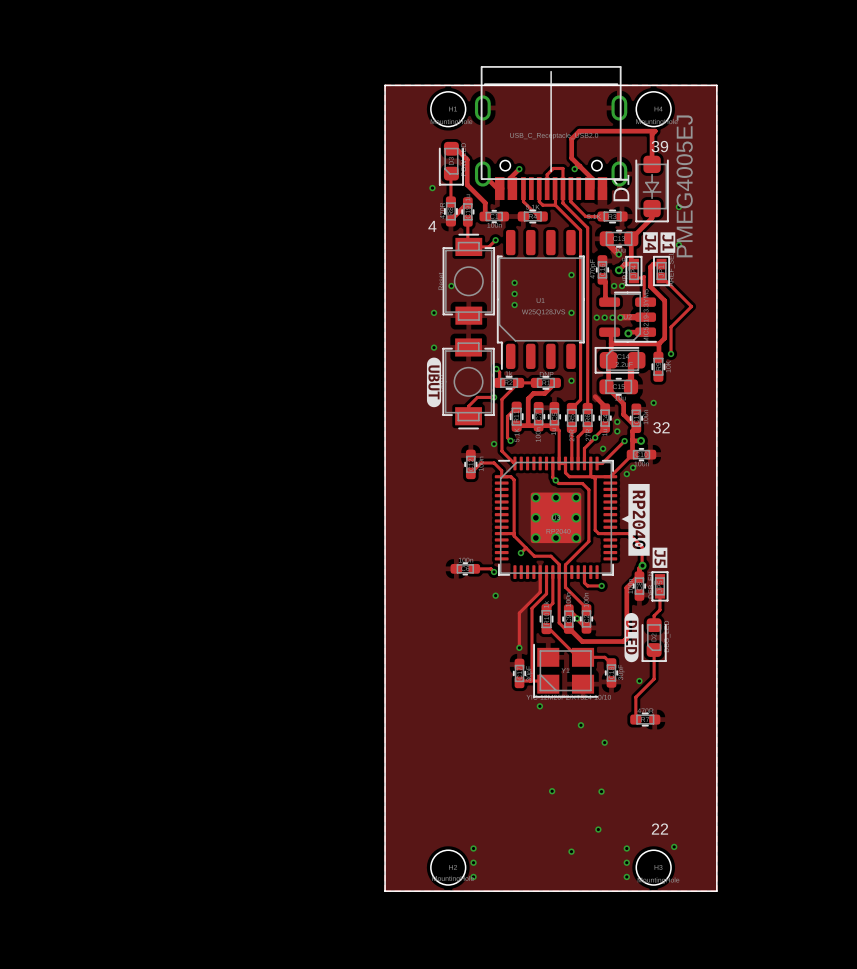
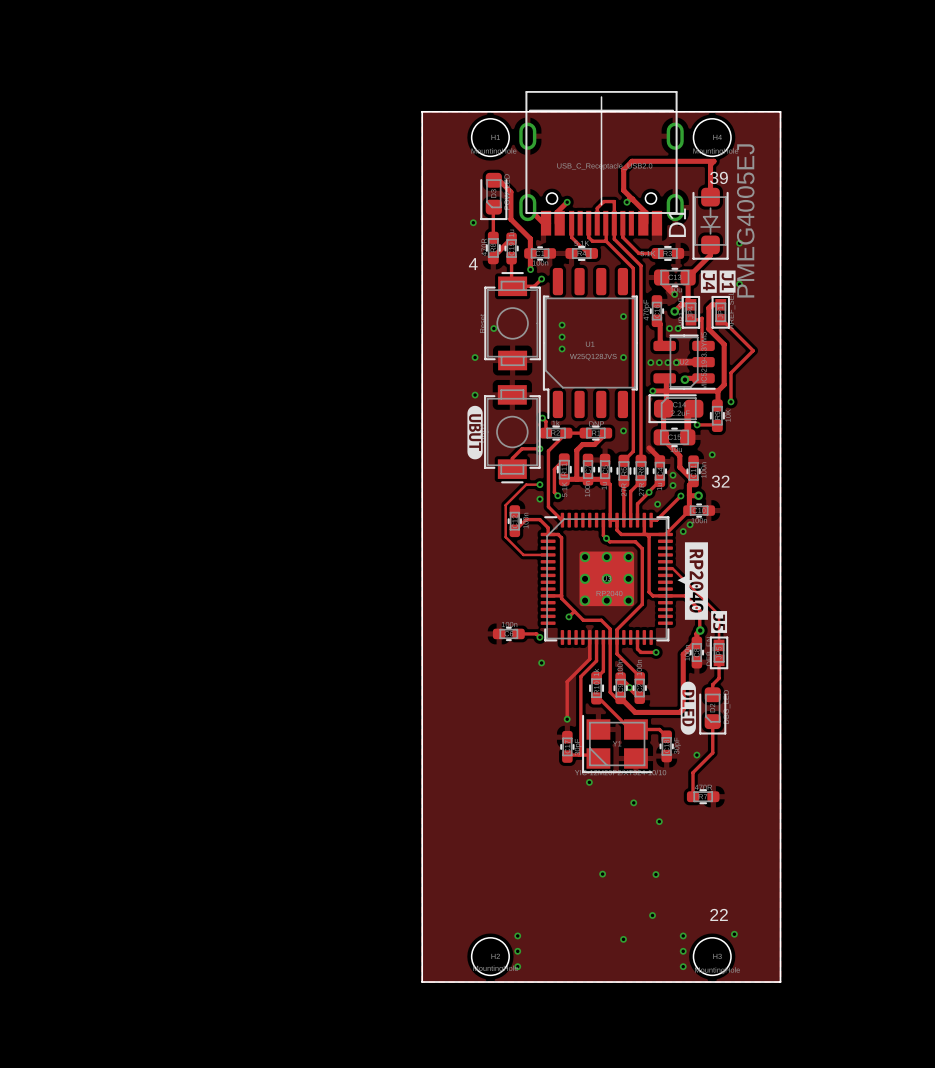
track: none -> (530, 253) (530, 269)
via: none -> (530, 269)
track: none -> (652, 391) (666, 391)
via: none -> (652, 391)
track: none -> (697, 424) (716, 424)
via: none -> (697, 424)
track: none -> (539, 484) (526, 484) (505, 505) (505, 537) (523, 554) (548, 554)
via: none -> (539, 484)
track: none -> (665, 568) (672, 568) (719, 614) (719, 645)

